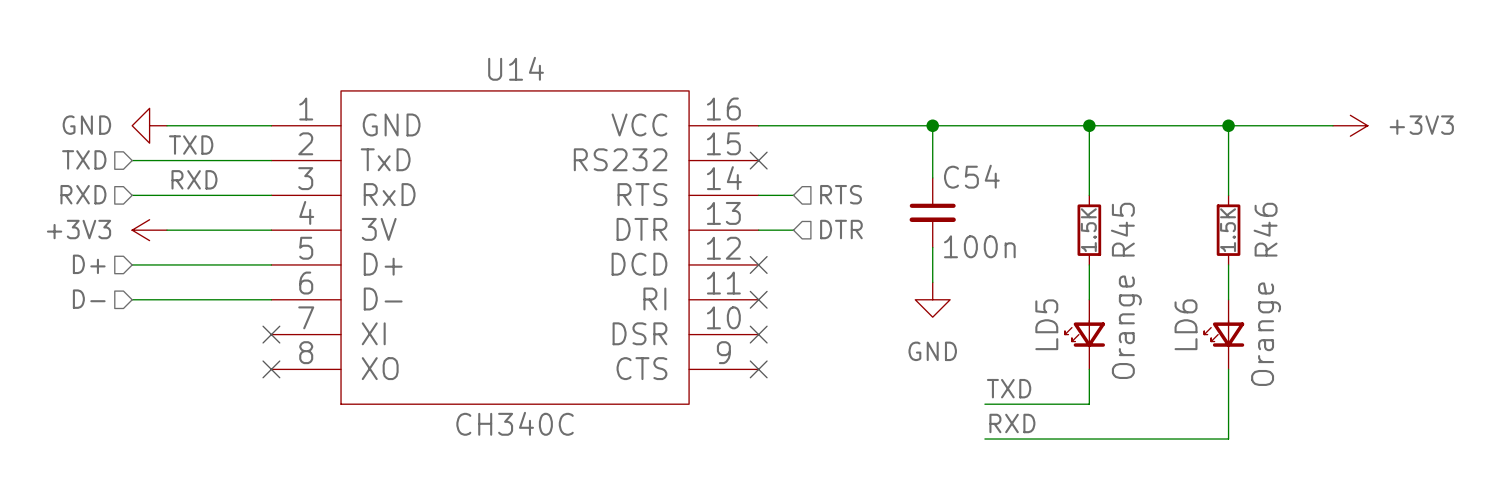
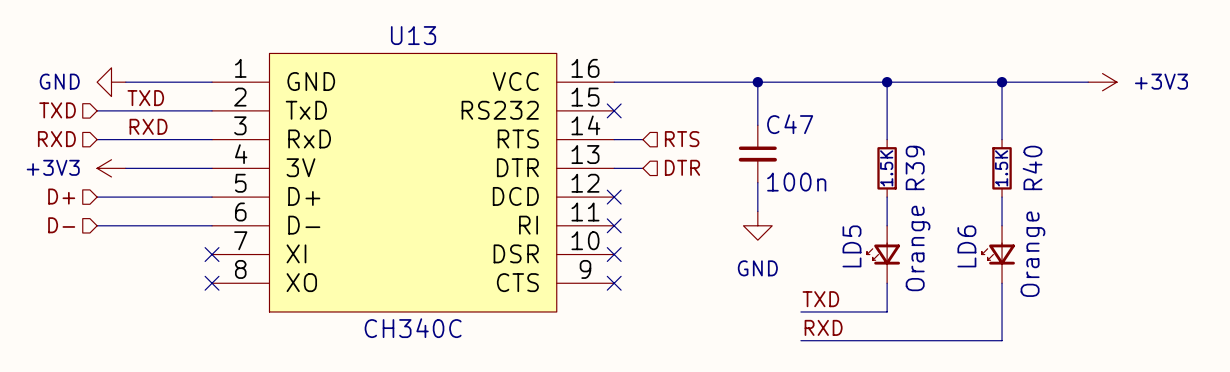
U14 name: U14 (516, 68) -> U13 (413, 35)
C54 name: C54 (971, 176) -> C47 (790, 124)
R45 name: R45 (1122, 229) -> R39 (915, 167)
R46 name: R46 (1265, 229) -> R40 (1032, 167)

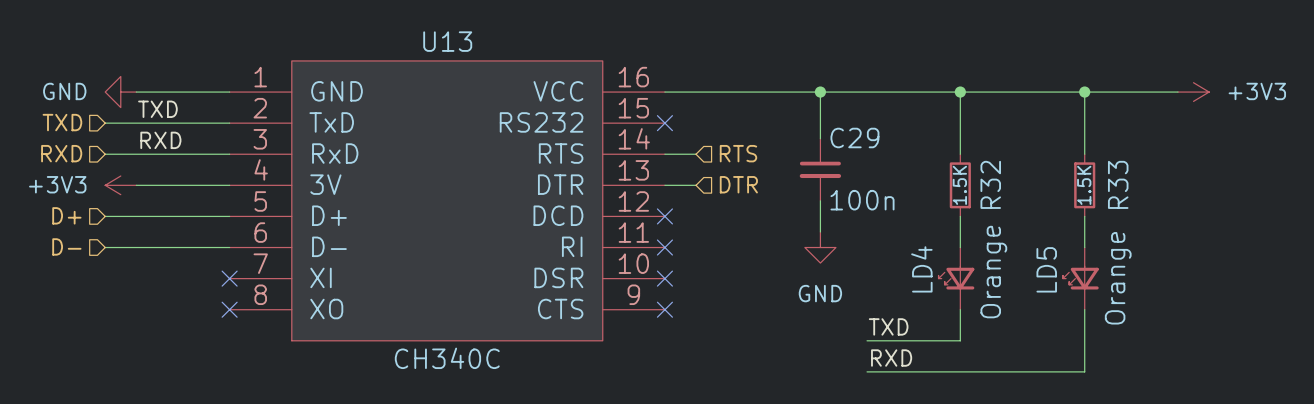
C47 name: C47 (790, 124) -> C29 (854, 137)
R39 name: R39 (915, 167) -> R32 (990, 184)
R40 name: R40 (1032, 167) -> R33 (1118, 184)
LD5 name: LD5 (851, 246) -> LD4 (921, 269)
LD6 name: LD6 (966, 246) -> LD5 (1046, 269)

